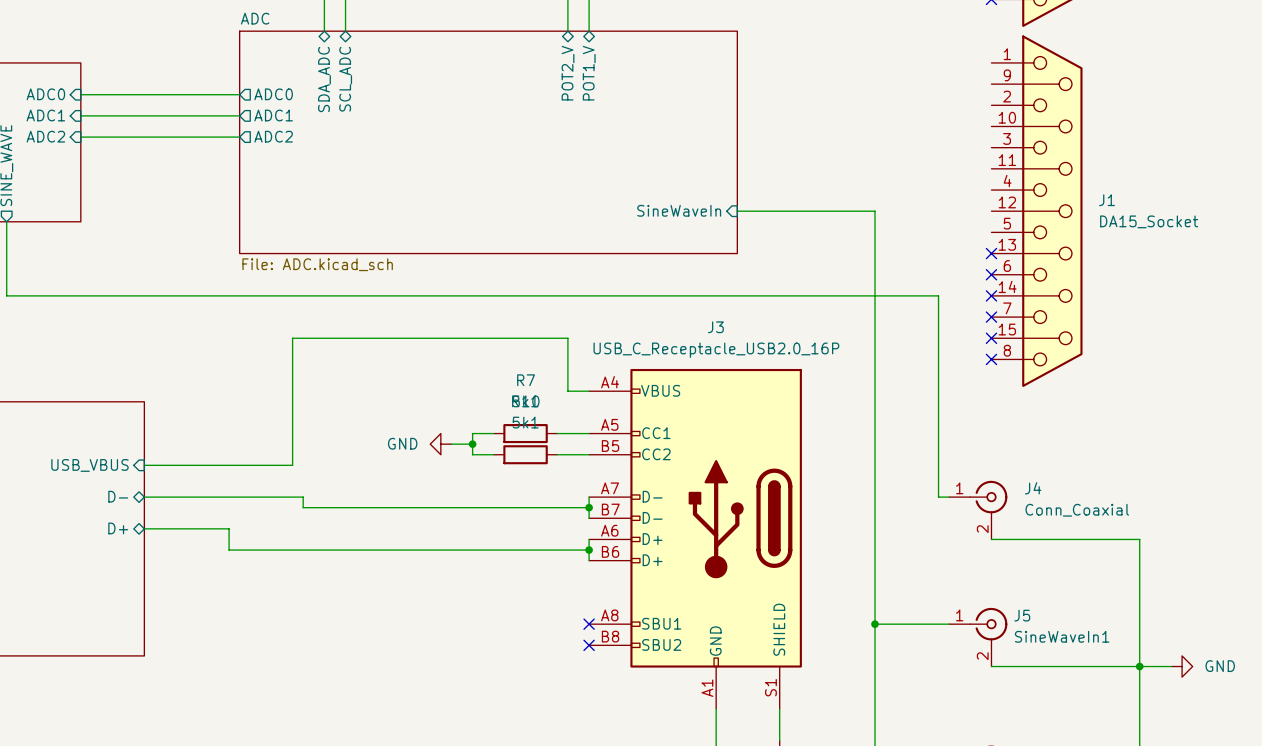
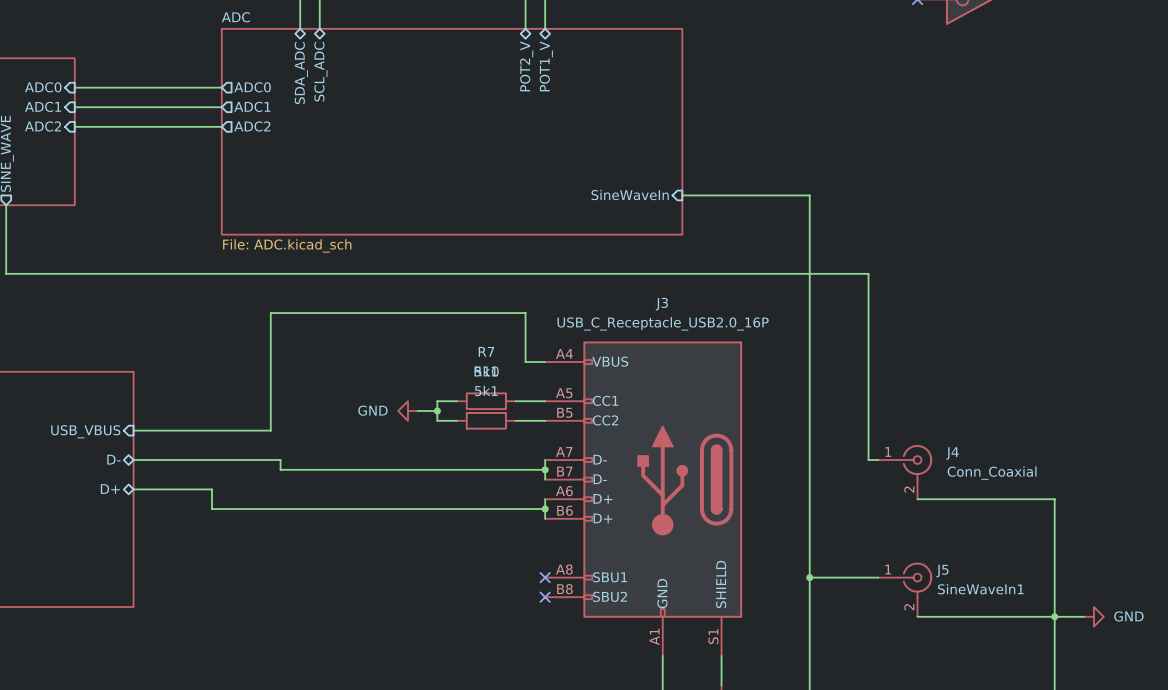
J1: DA15_Socket (1037, 211) -> none
no-connect mark: (991, 253) -> none
no-connect mark: (991, 274) -> none
no-connect mark: (991, 295) -> none
no-connect mark: (991, 317) -> none
no-connect mark: (991, 338) -> none
no-connect mark: (991, 359) -> none

